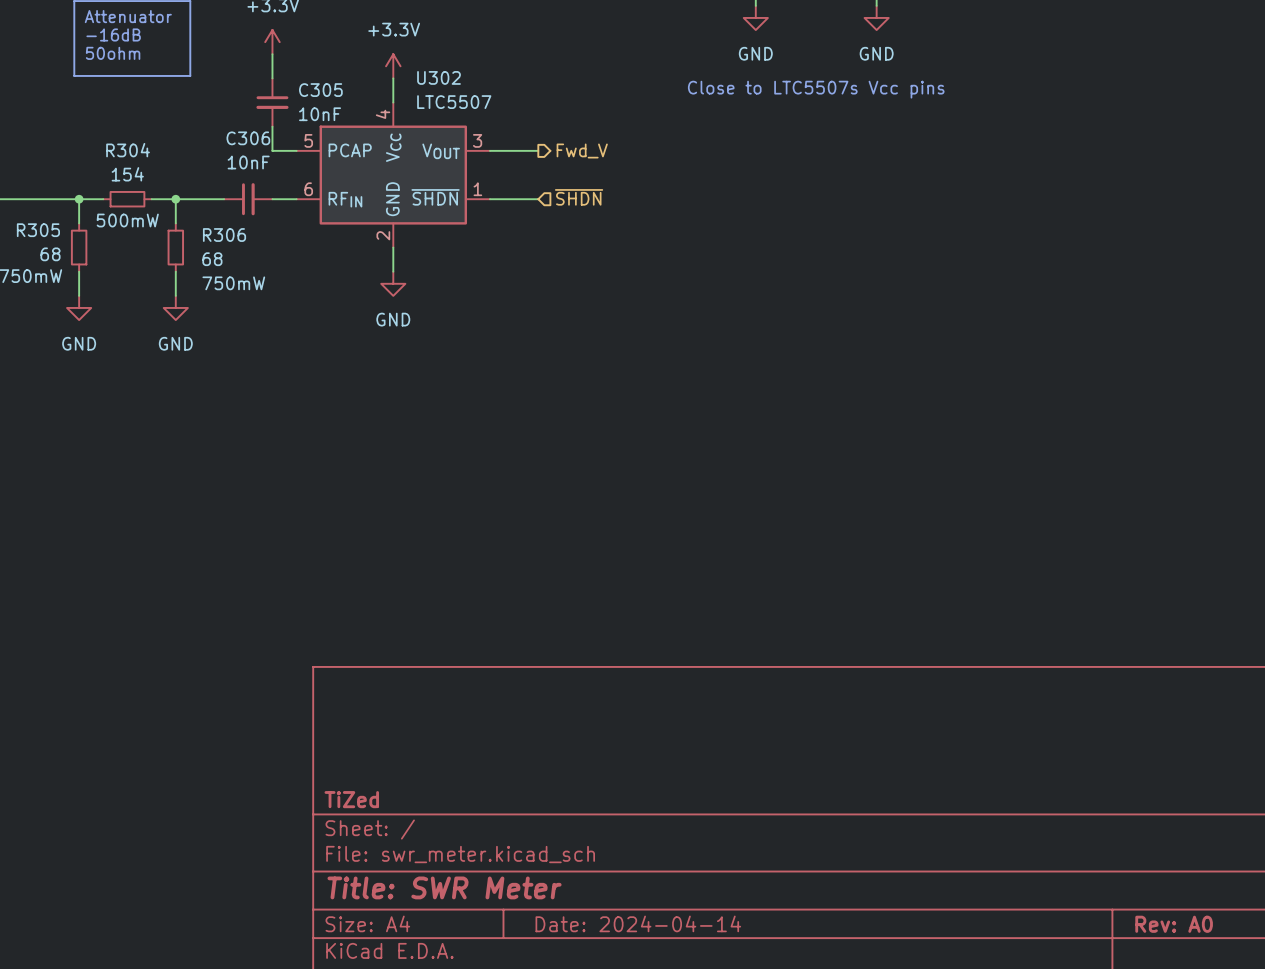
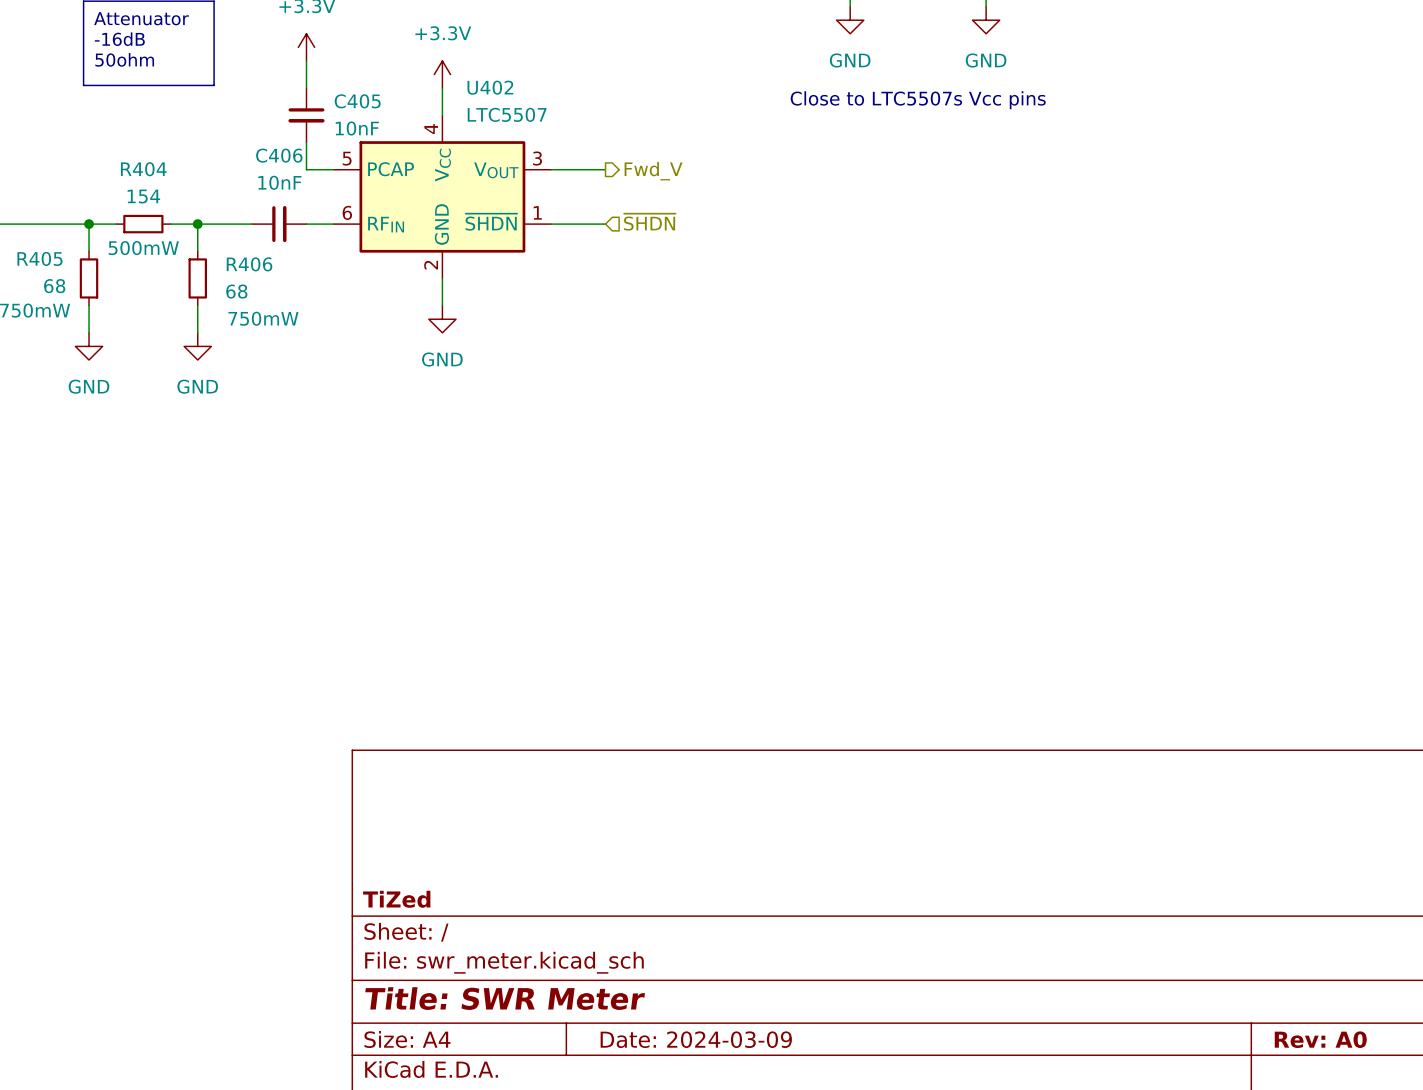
U302 name: U302 (439, 77) -> U402 (490, 87)
C305 name: C305 (320, 90) -> C405 (357, 101)
C306 name: C306 (248, 138) -> C406 (279, 155)
R304 name: R304 (128, 150) -> R404 (143, 169)
R305 name: R305 (38, 230) -> R405 (39, 258)
R306 name: R306 (224, 235) -> R406 (249, 264)
title block: Date: 2024-04-14 (638, 923) -> Date: 2024-03-09 (696, 1039)

